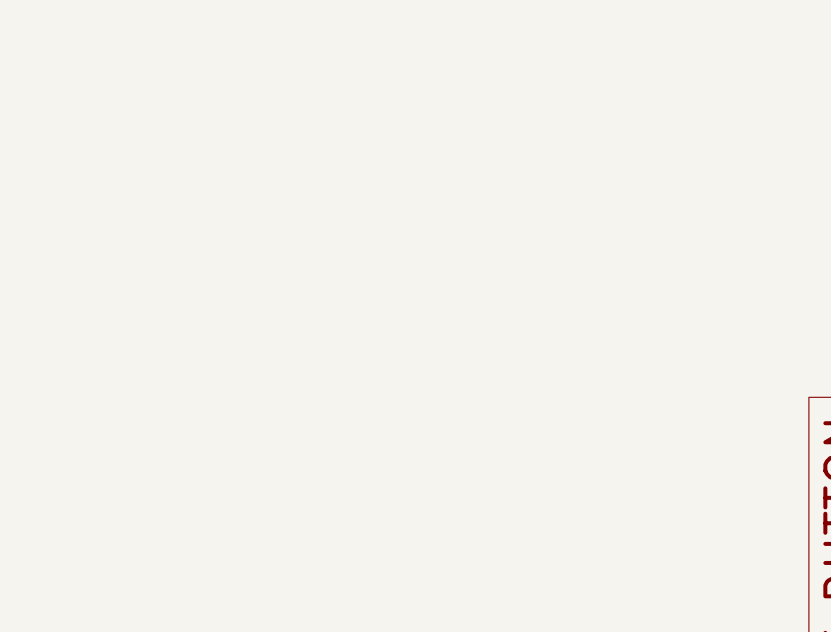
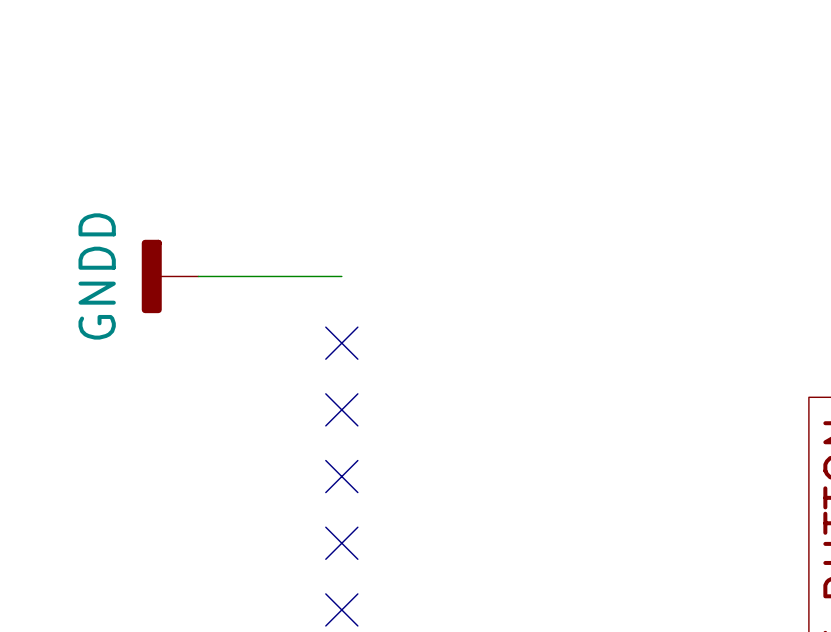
power symbol: none -> GNDD (170, 276)
wire: none -> (198, 276) (341, 276)
no-connect mark: none -> (341, 343)
no-connect mark: none -> (341, 409)
no-connect mark: none -> (341, 476)
no-connect mark: none -> (341, 543)
no-connect mark: none -> (341, 609)

